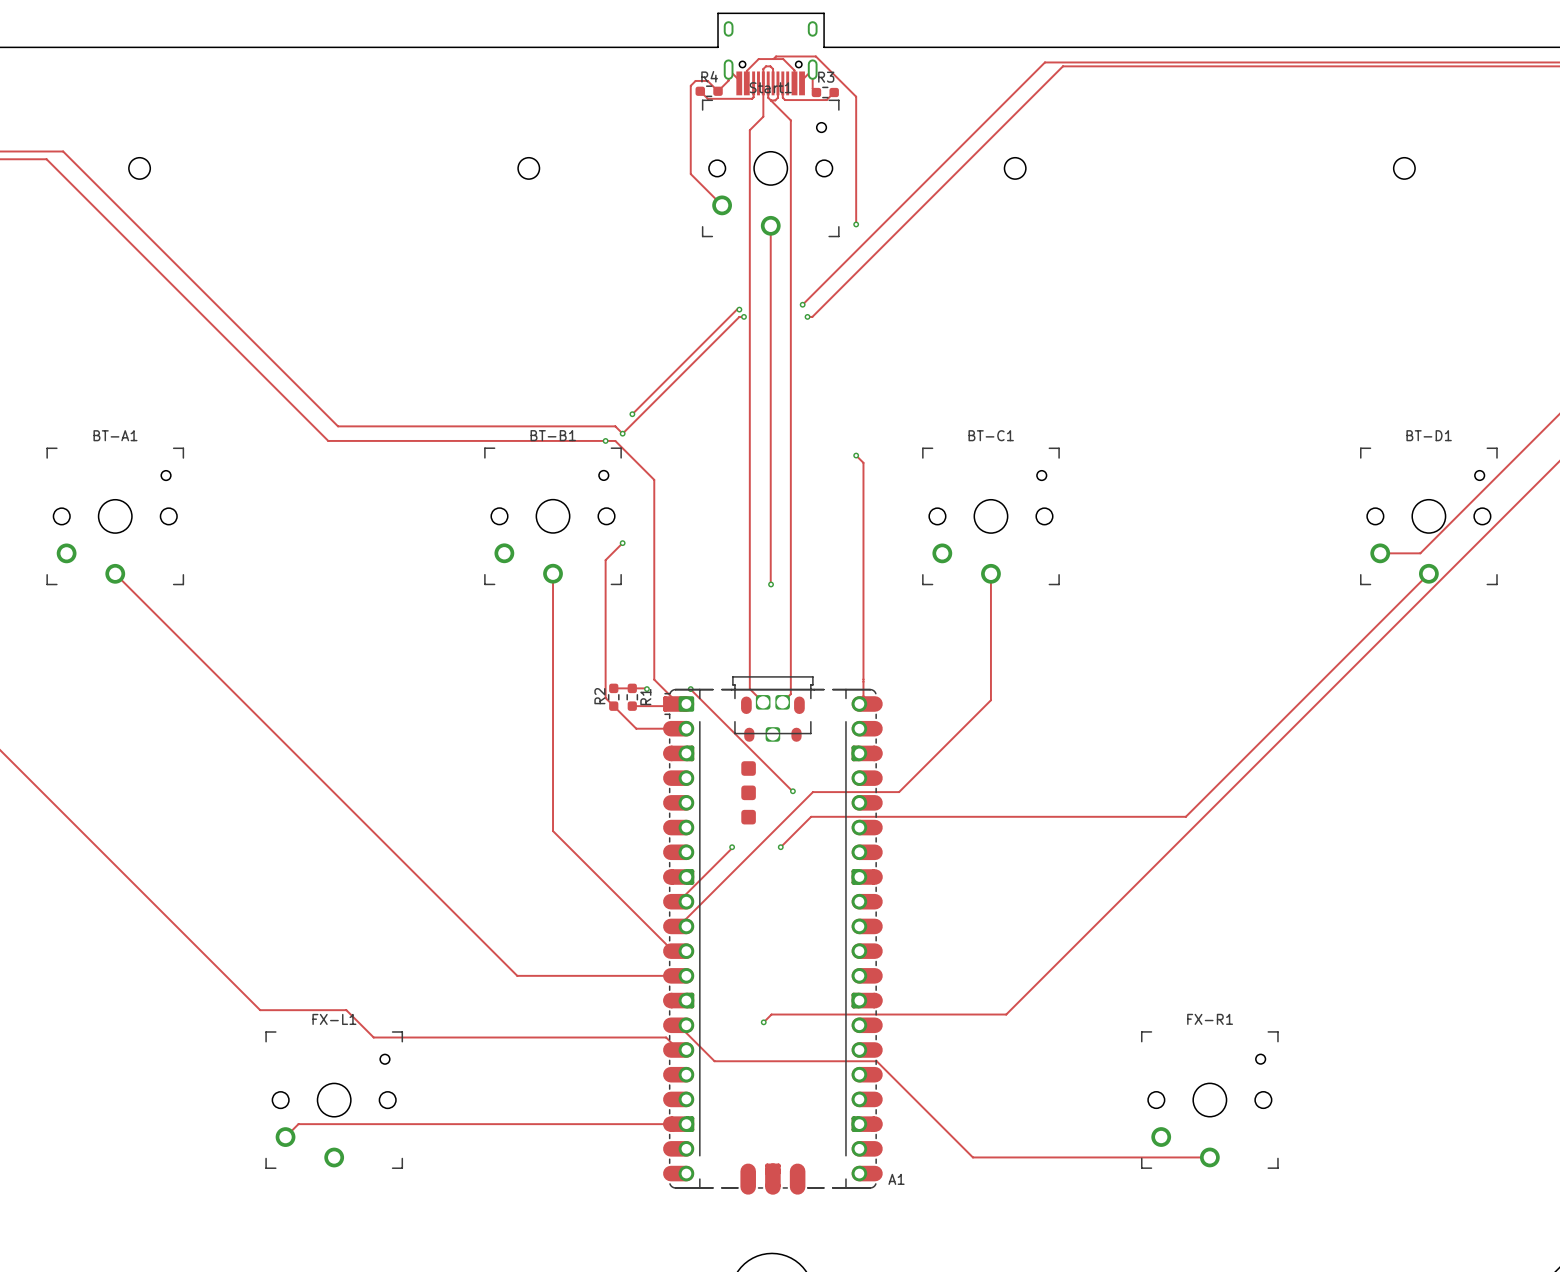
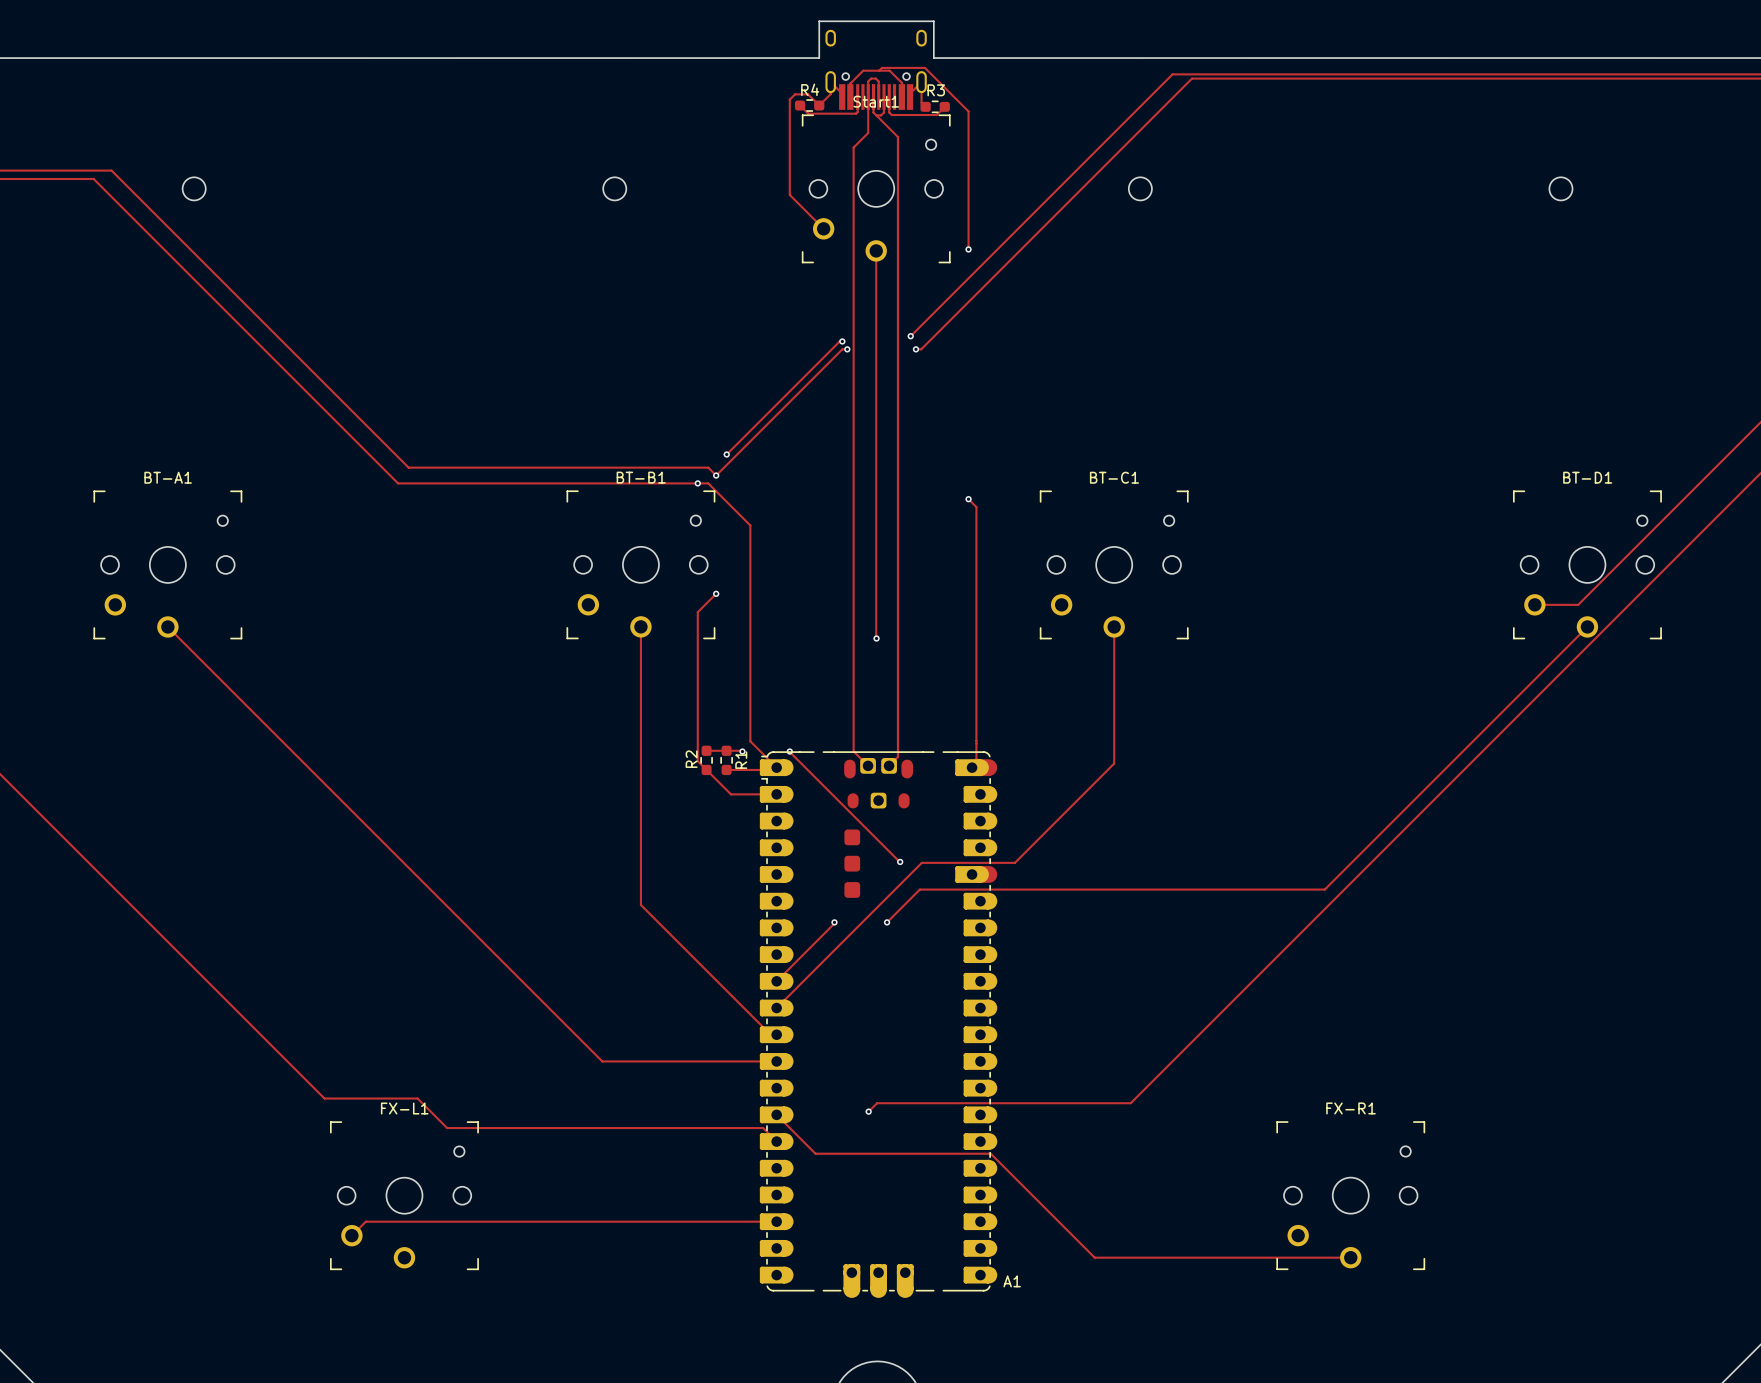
A1 footprint: [663, 676, 883, 1195] -> [759, 751, 998, 1298]

